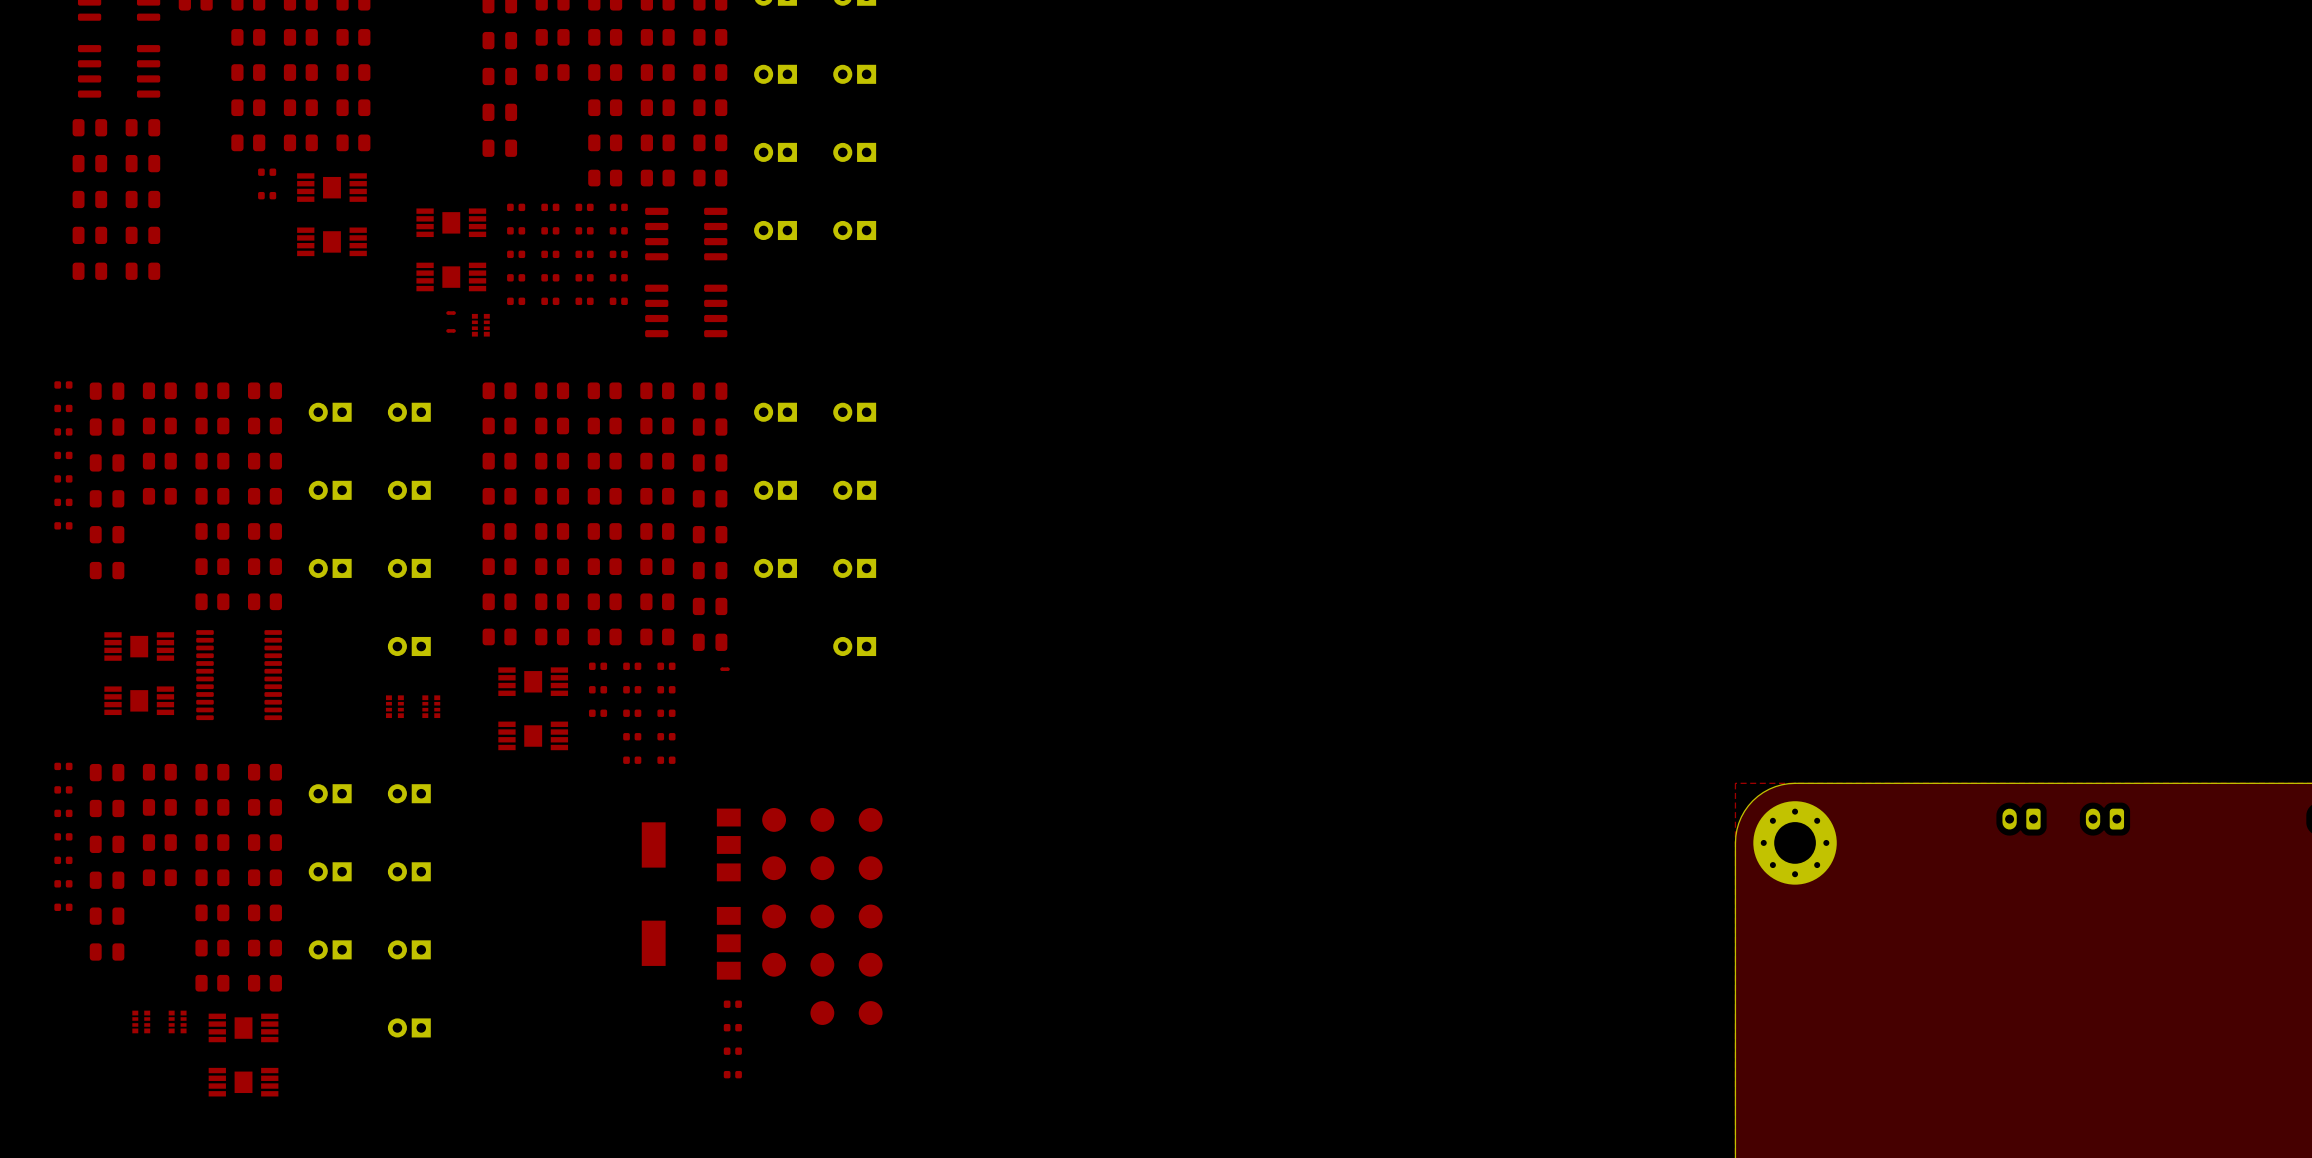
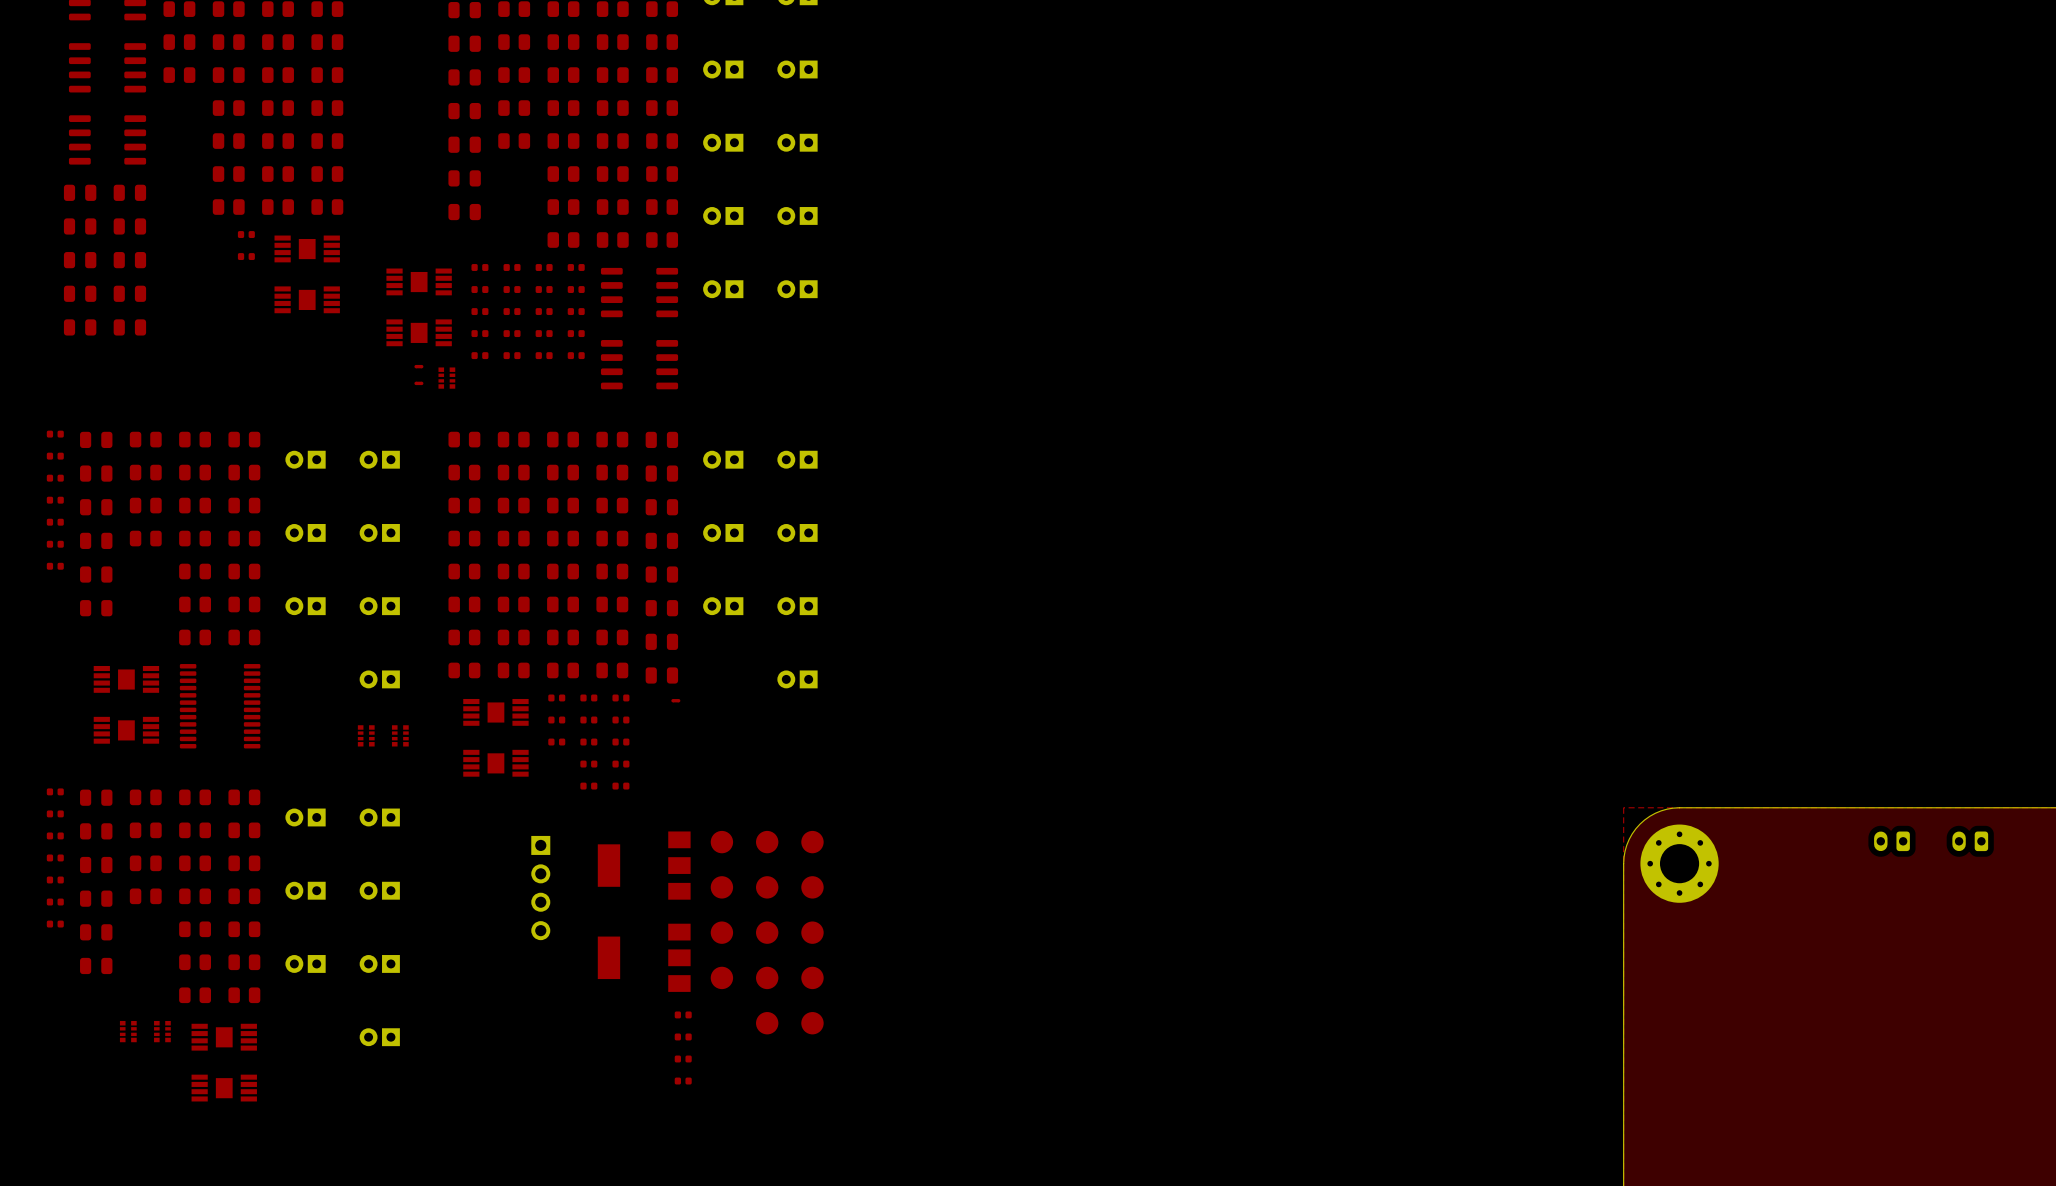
part: none -> (540, 888)

